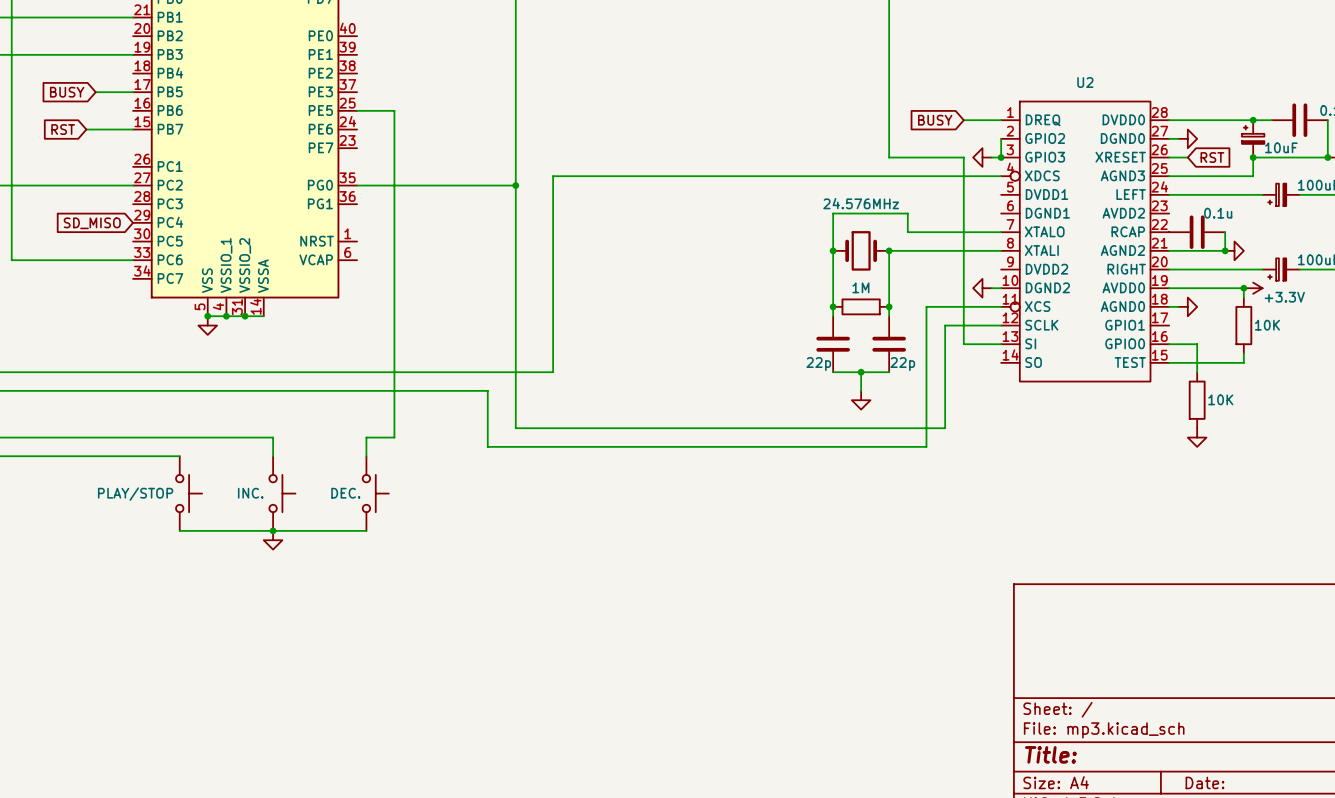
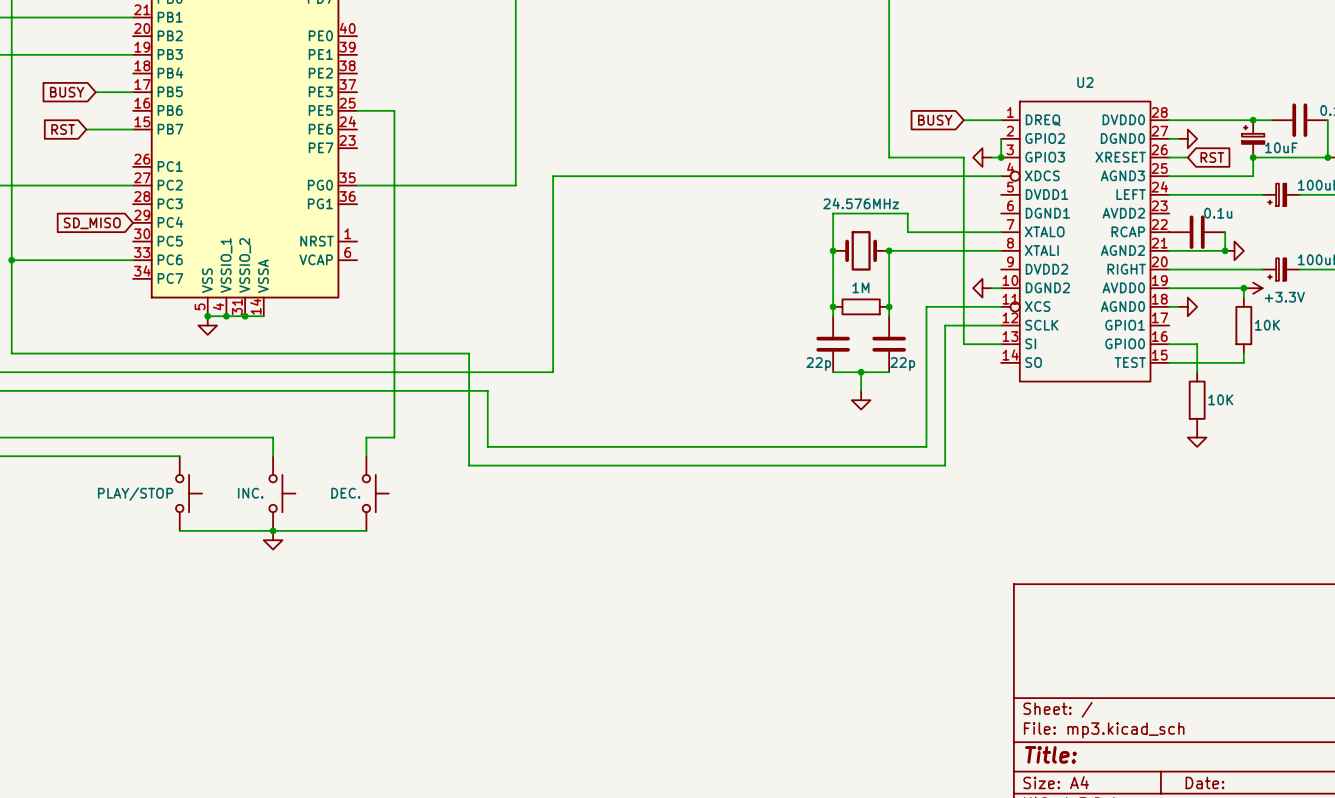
wire: (515, 185) (515, 428) (945, 428) -> (11, 260) (11, 353) (469, 353) (469, 465) (945, 465) (945, 428)
junction: (515, 185) -> none
junction: none -> (11, 260)

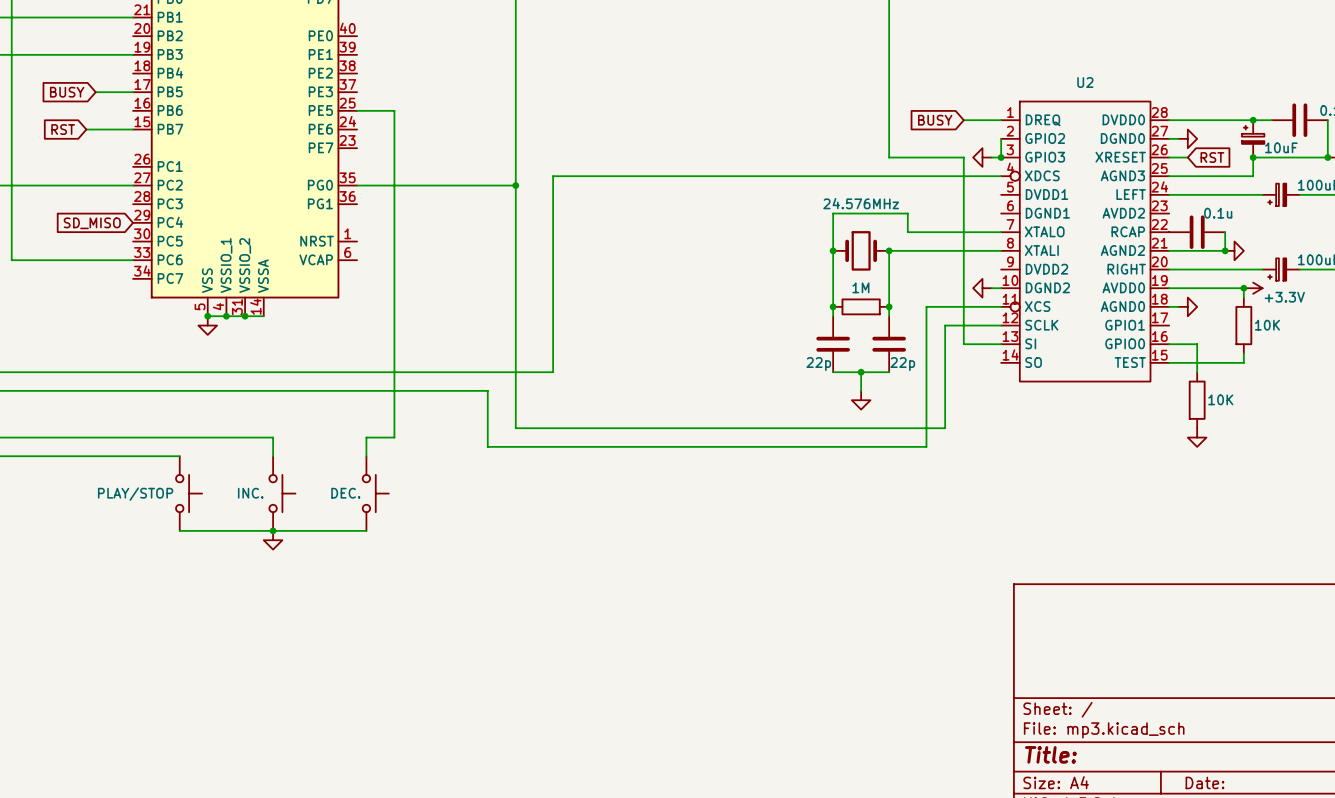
junction: none -> (515, 185)
wire: (11, 260) (11, 353) (469, 353) (469, 465) (945, 465) (945, 428) -> (515, 185) (515, 428) (945, 428)
junction: (11, 260) -> none

